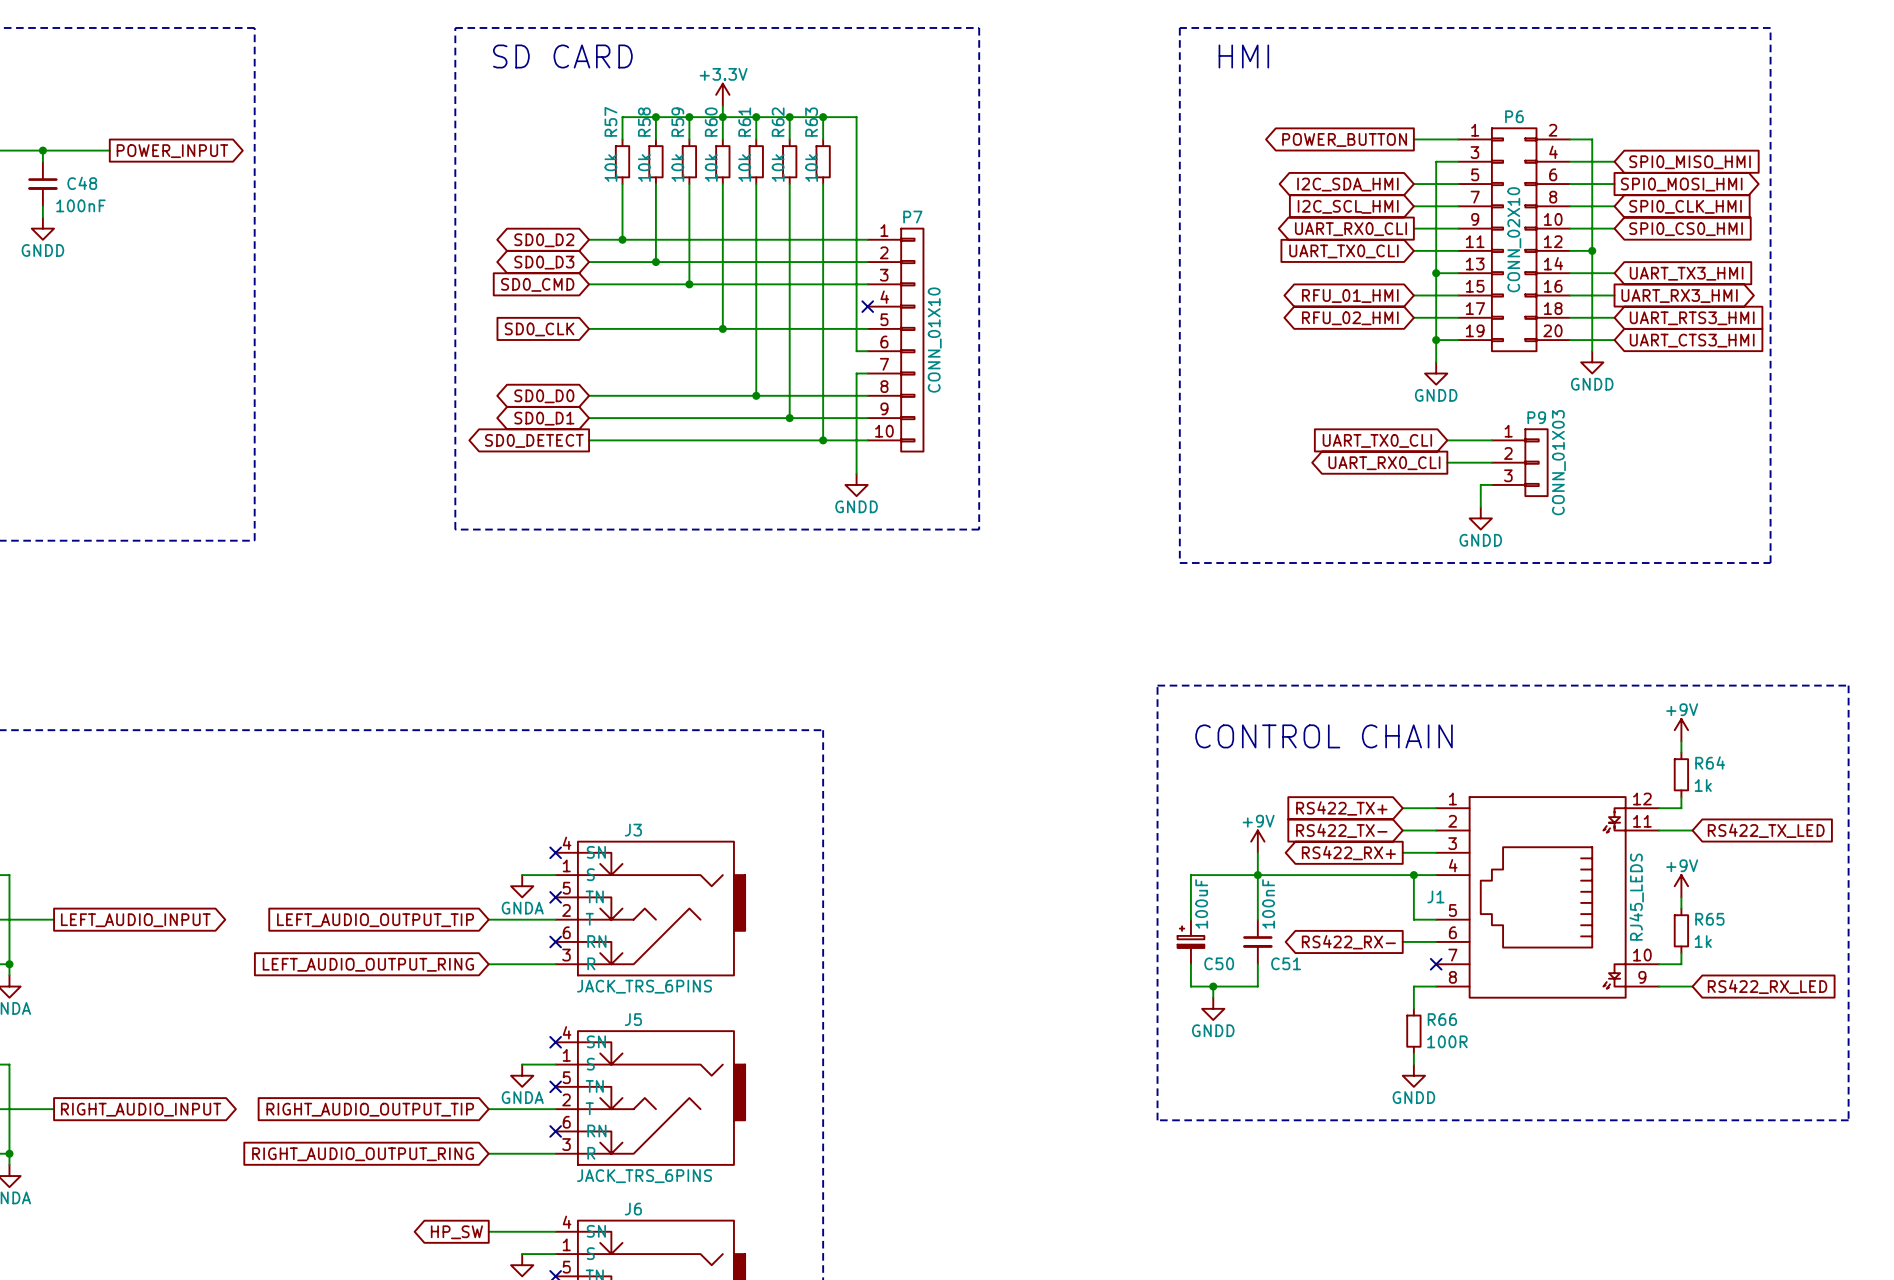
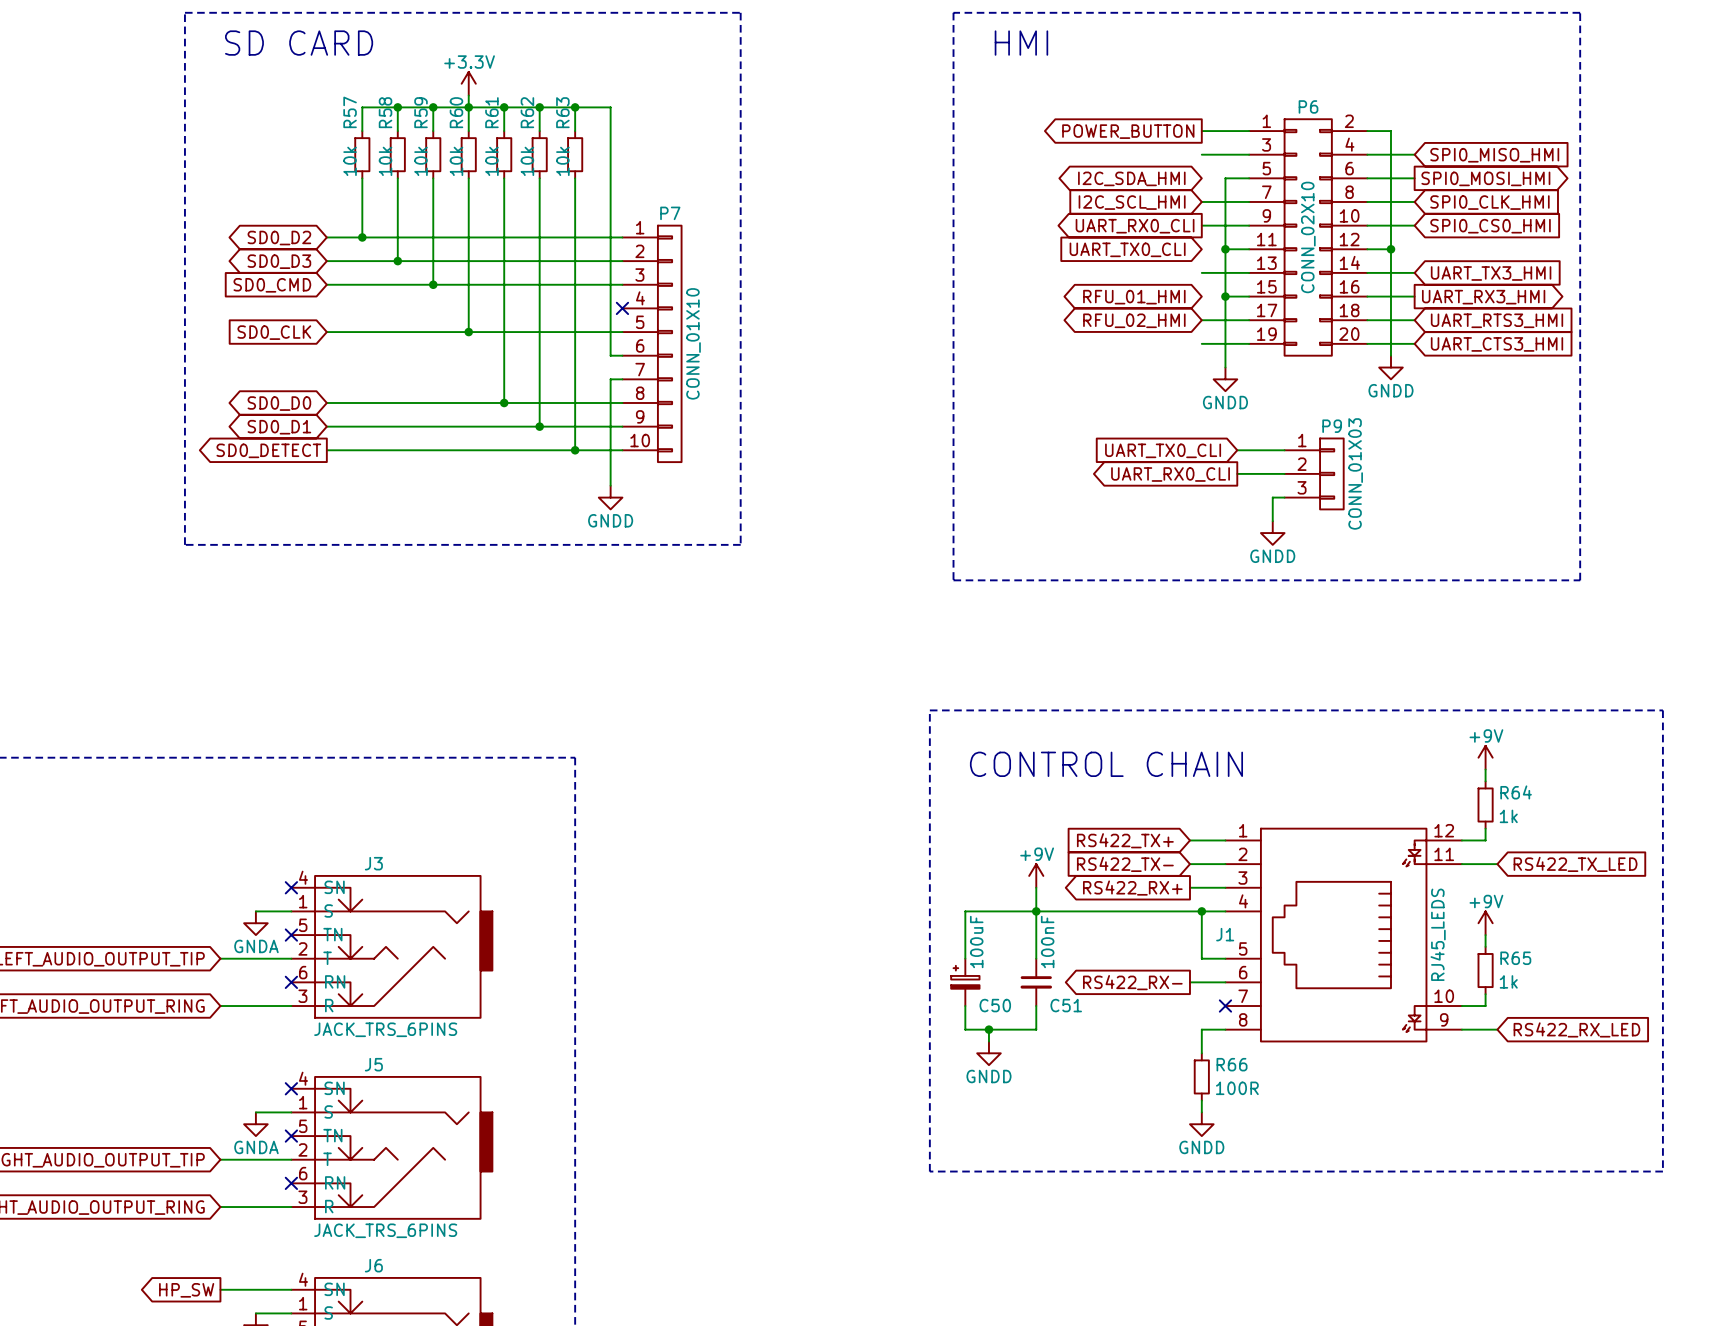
wire: (1436, 161) (1436, 184) (1413, 184) -> (1225, 154) (1201, 154)
wire: (1413, 250) (1436, 250) -> (1201, 272) (1225, 272)
junction: none -> (1225, 249)
junction: (1436, 273) -> none
wire: (1413, 295) (1436, 295) -> (1201, 343) (1225, 343)
junction: none -> (1225, 296)
junction: (1436, 340) -> none

